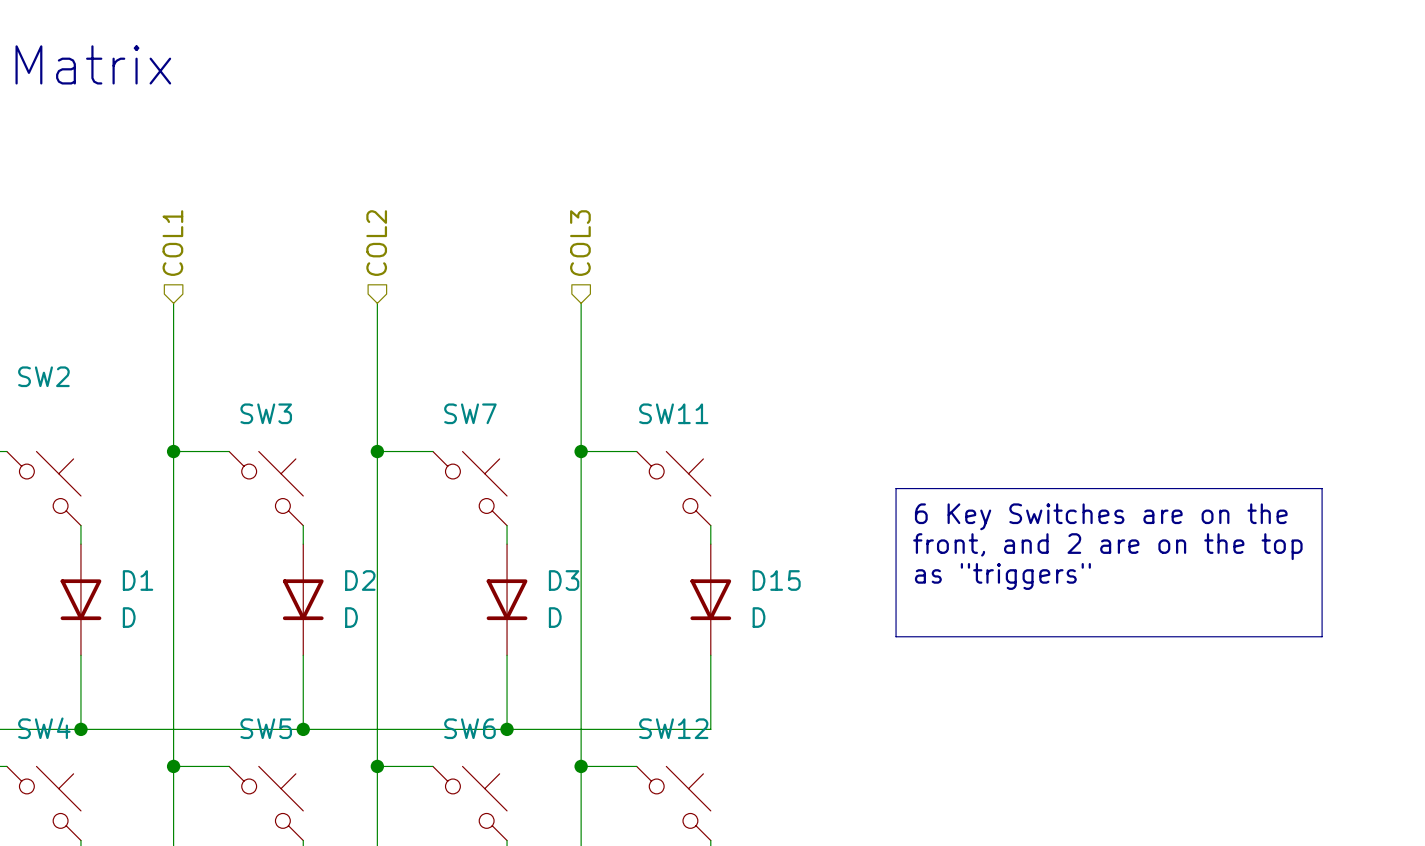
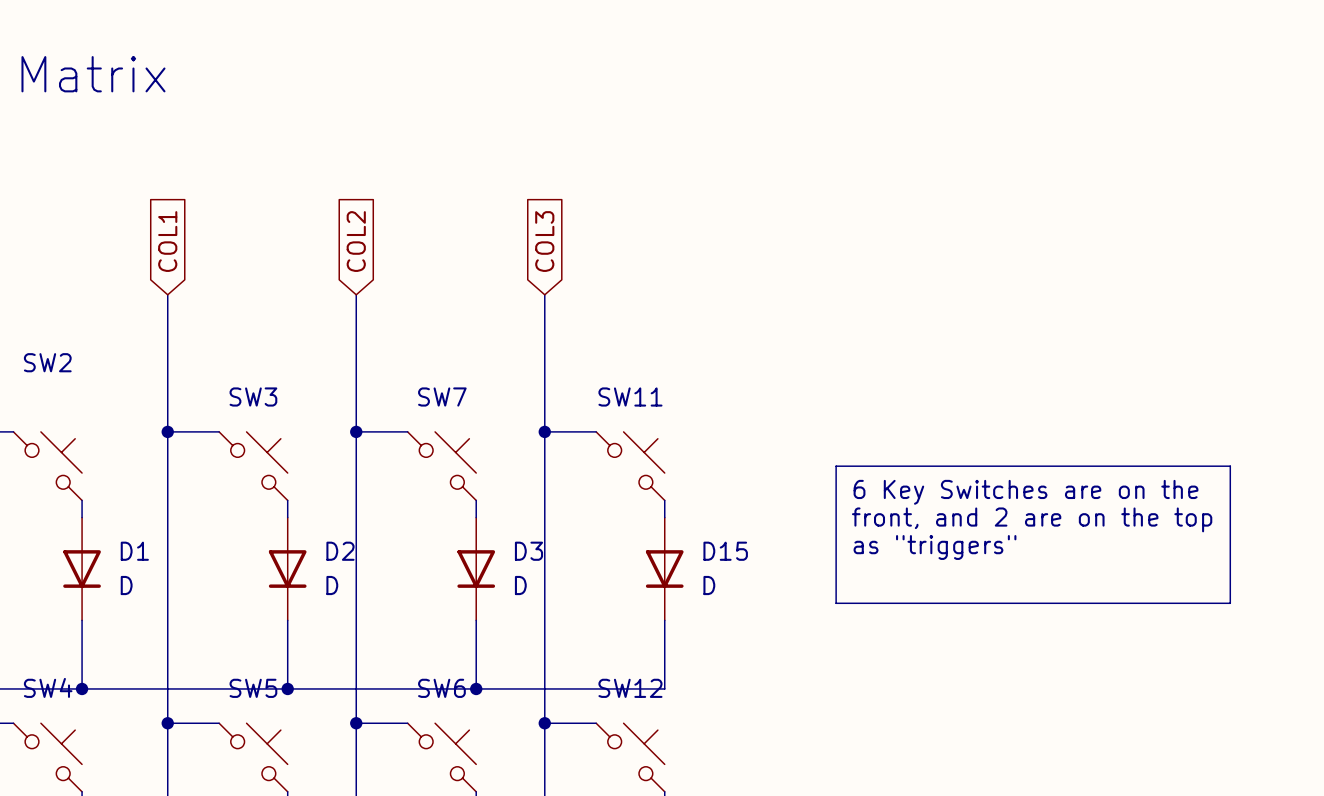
hierarchical label: COL1 (172, 243) -> none
hierarchical label: COL2 (376, 243) -> none
hierarchical label: COL3 (580, 243) -> none
global label: none -> COL1 (167, 241)
global label: none -> COL2 (356, 241)
global label: none -> COL3 (544, 241)

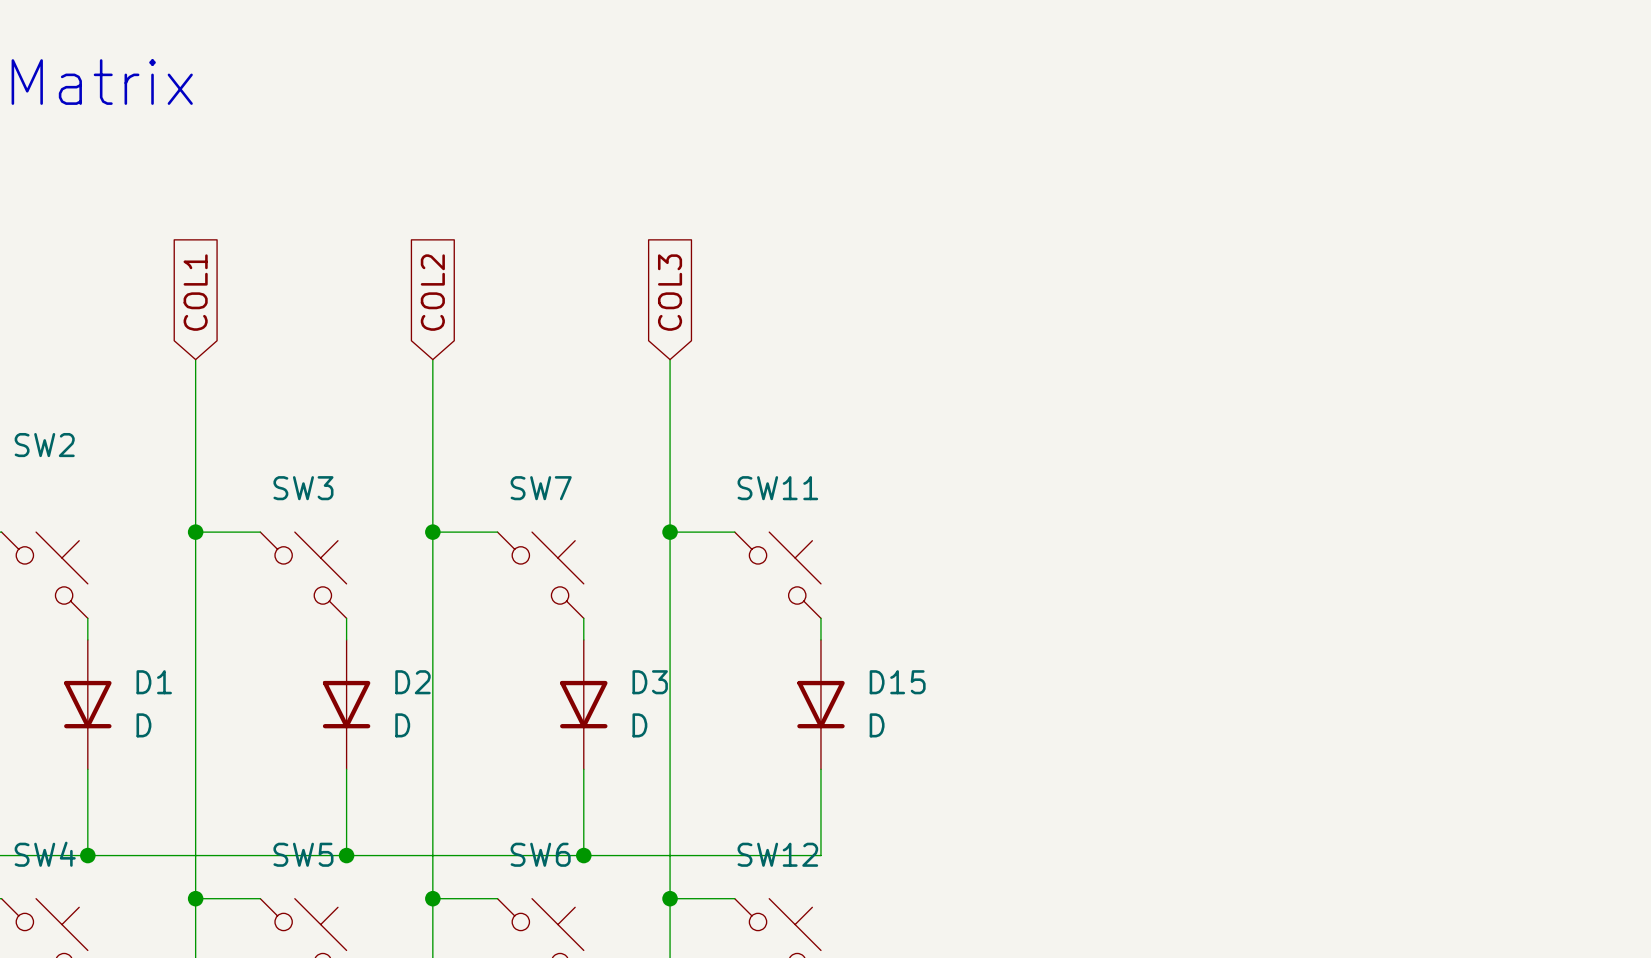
line: (836, 466) (1230, 466) (1230, 603) (836, 603) (836, 466) -> none
text: 6 Key Switches are on the (1026, 492) -> none
text: front, and 2 are on the top (1032, 519) -> none
text: as "triggers" (935, 547) -> none

